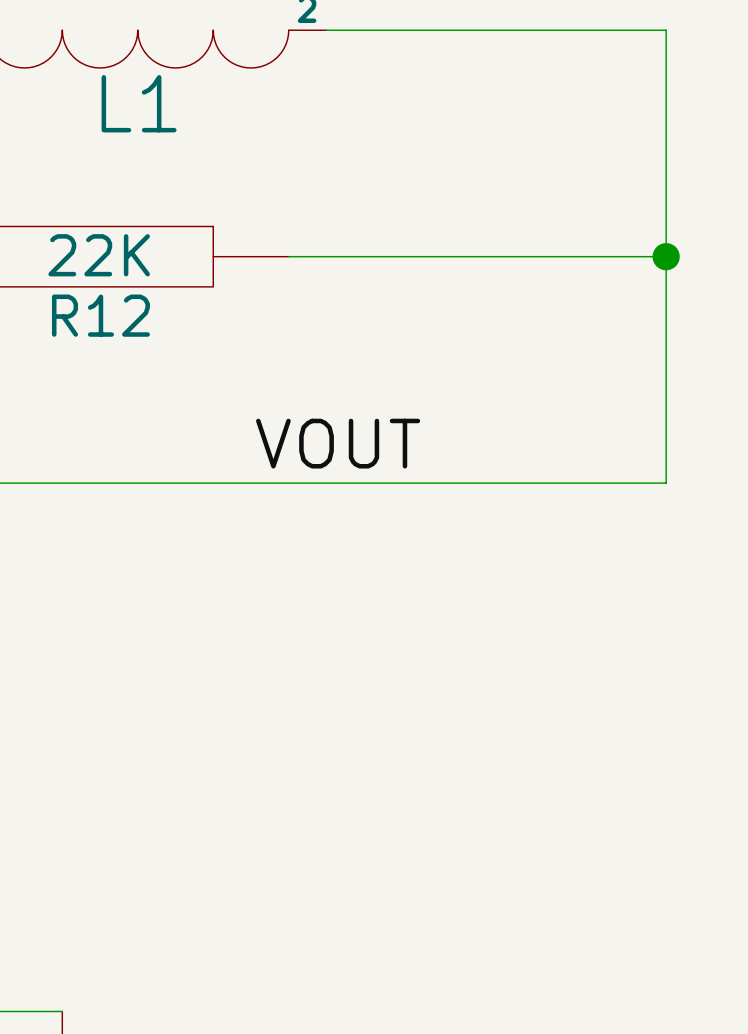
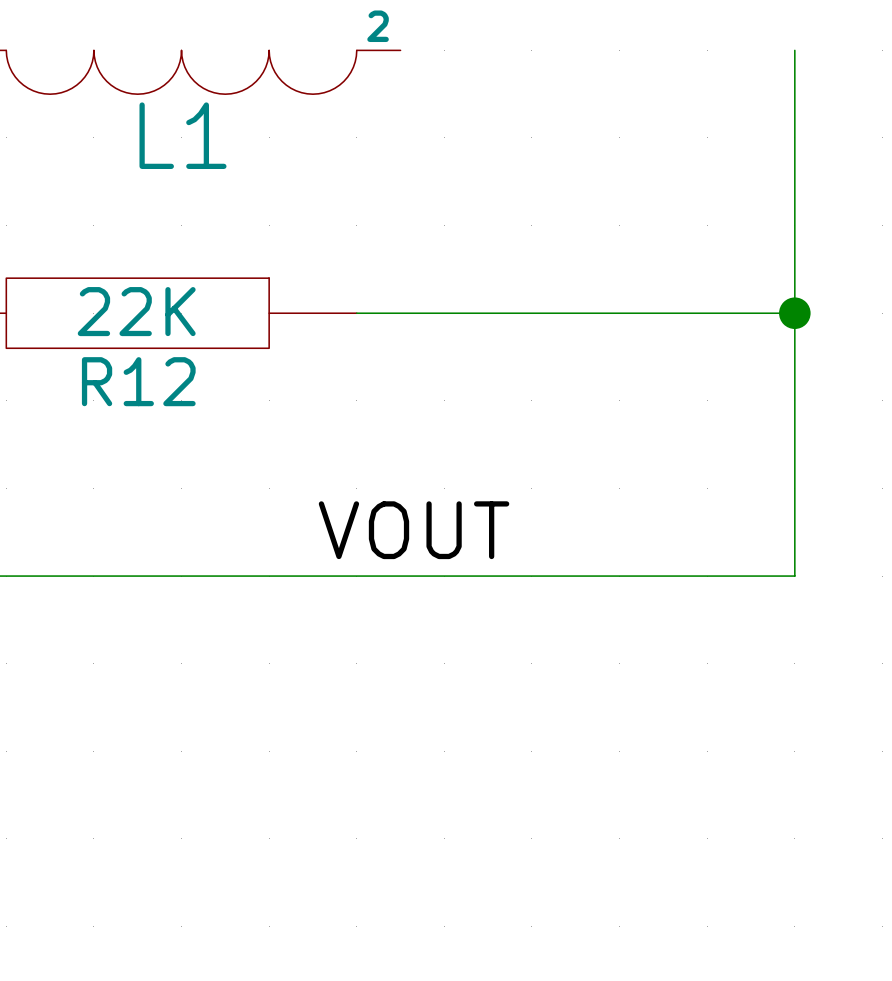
wire: (326, 30) (666, 30) -> none

